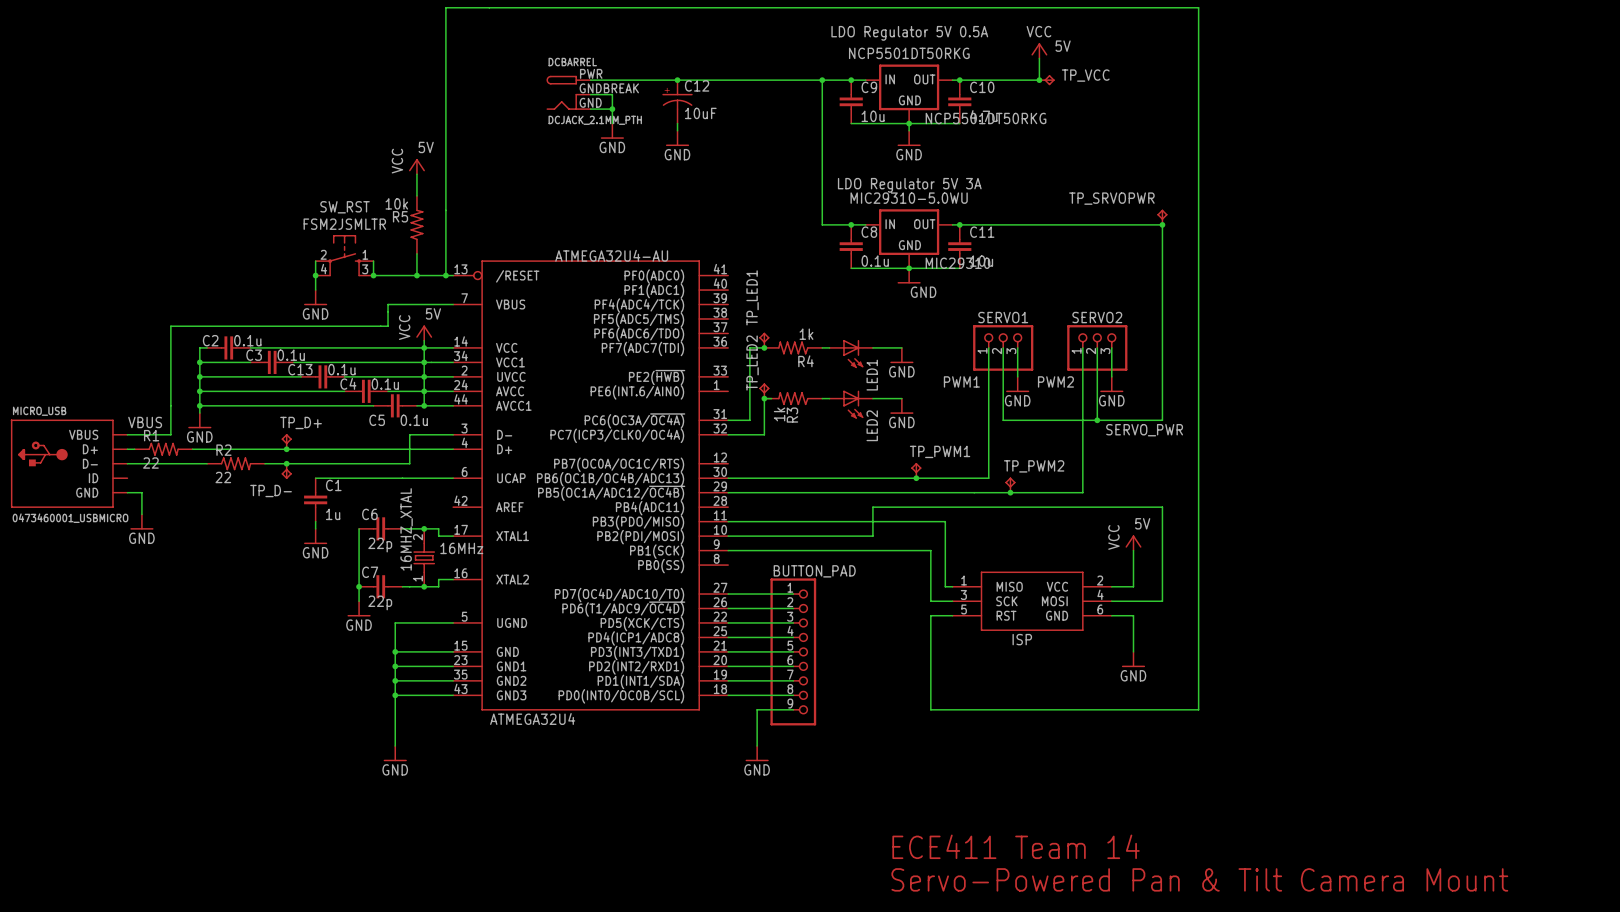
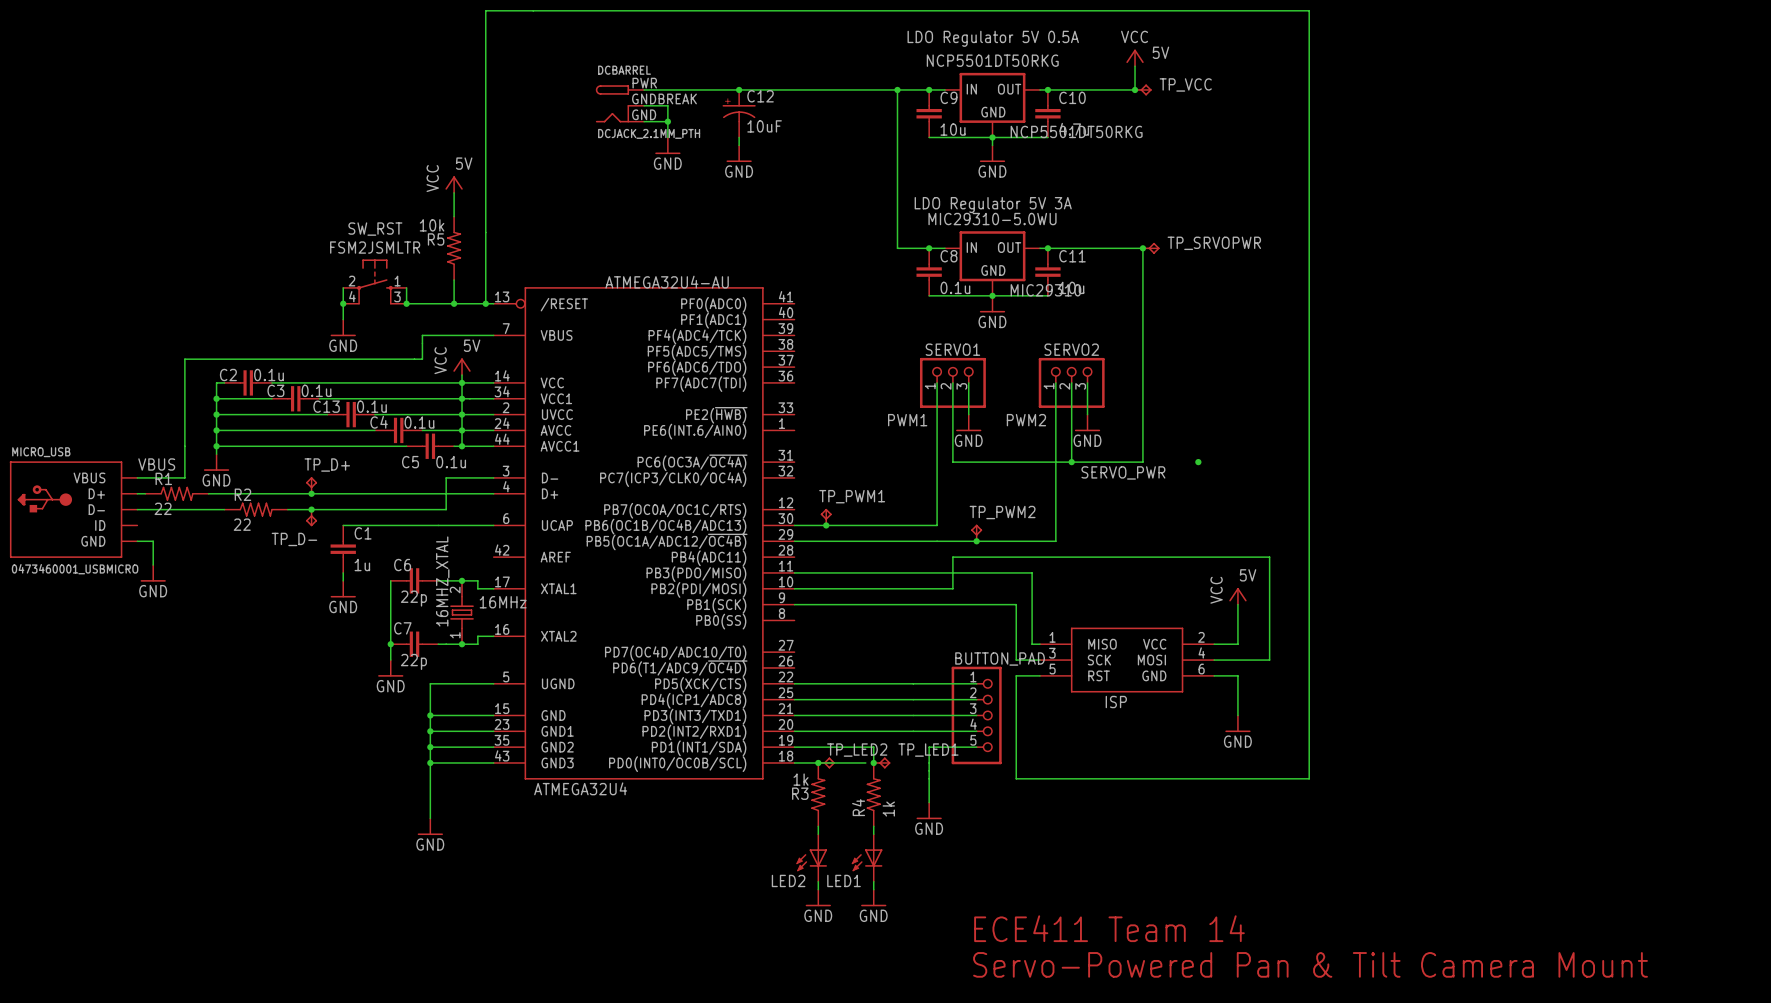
TP_SRVOPWR name position: TP_SRVOPWR (1111, 198) -> TP_SRVOPWR (1214, 243)
TP_SRVOPWR rotation: 0° (1162, 214) -> 90° clockwise (1154, 248)
TP_SRVOPWR position: (1162, 217) -> (1151, 248)
wire: (1046, 224) (1162, 224) (1162, 420) (1046, 420) -> (1142, 248) (1142, 462)
junction: none -> (1142, 248)
junction: (1162, 224) -> none
power symbol text position: GND (923, 292) -> GND (992, 321)
TP_LED1 rotation: 0° (764, 337) -> 90° clockwise (884, 762)
TP_LED1 position: (764, 340) -> (882, 762)
wire: (764, 347) (749, 347) (749, 420) (728, 420) -> none
junction: (764, 347) -> none
R4 rotation: 0° (793, 347) -> 90° clockwise (873, 794)
R4 position: (793, 347) -> (873, 794)
wire: (822, 347) (829, 347) -> none
wire: (872, 347) (901, 347) -> (952, 382) (952, 462) (1095, 462)
wire: none -> (968, 382) (968, 414)
wire: (988, 347) (988, 478) (858, 478) -> (937, 382) (937, 525)
wire: (1003, 347) (1003, 420) -> (1071, 382) (1071, 462)
SERVO1 position: (1003, 347) -> (952, 382)
wire: (1017, 347) (1017, 376) -> (1087, 382) (1087, 414)
wire: (1082, 347) (1082, 492) (967, 492) -> (1055, 382) (1055, 541)
wire: (1097, 347) (1097, 420) -> none
SERVO2 position: (1097, 347) -> (1071, 382)
wire: (1111, 347) (1111, 376) -> none
LED1 position: (851, 353) -> (867, 858)
LED1 rotation: 0° (853, 353) -> 90° clockwise (867, 860)
power symbol: GND (901, 355) -> none
label position: PWM1 (961, 381) -> PWM1 (907, 420)
label position: PWM2 (1055, 381) -> PWM2 (1026, 420)
power symbol: none -> GND (968, 422)
power symbol position: GND (1017, 384) -> GND (1087, 422)
power symbol: GND (1111, 384) -> none
TP_LED2 rotation: 0° (764, 388) -> 90° clockwise (829, 762)
TP_LED2 position: (764, 391) -> (826, 762)
junction: (764, 398) -> none
wire: (771, 398) (764, 398) (764, 434) (728, 434) -> none
R3 rotation: 0° (793, 398) -> 90° clockwise (818, 794)
R3 position: (793, 398) -> (818, 794)
wire: (822, 398) (829, 398) -> none
wire: (872, 398) (901, 398) -> none
LED2 position: (851, 404) -> (811, 858)
LED2 rotation: 0° (853, 404) -> 90° clockwise (811, 860)
power symbol: GND (901, 406) -> none
junction: none -> (1071, 462)
label position: SERVO_PWR (1144, 430) -> SERVO_PWR (1123, 472)
TP_PWM1 position: (916, 470) -> (826, 517)
junction: none -> (826, 525)
junction position: (916, 478) -> (976, 541)
TP_PWM2 position: (1010, 485) -> (976, 532)
junction: (1010, 492) -> none
wire: (728, 594) (793, 594) -> none
wire: (728, 608) (793, 608) -> none
wire: none -> (865, 683) (976, 683)
wire: none -> (865, 699) (976, 699)
wire: none -> (865, 715) (976, 715)
BUTTON_PAD: (793, 651) -> none
BUTTON_PAD: none -> (976, 715)
wire: none -> (865, 731) (976, 731)
wire: none -> (976, 747) (929, 747) (929, 802)
junction: none -> (818, 762)
junction: none -> (873, 762)
wire: (793, 709) (757, 709) (757, 746) -> none
power symbol: none -> GND (929, 810)
wire: none -> (818, 826) (818, 834)
power symbol: GND (757, 753) -> none
wire: none -> (873, 826) (873, 834)
wire: none -> (818, 881) (818, 889)
wire: none -> (873, 881) (873, 889)
power symbol: none -> GND (818, 897)
power symbol: none -> GND (873, 897)

